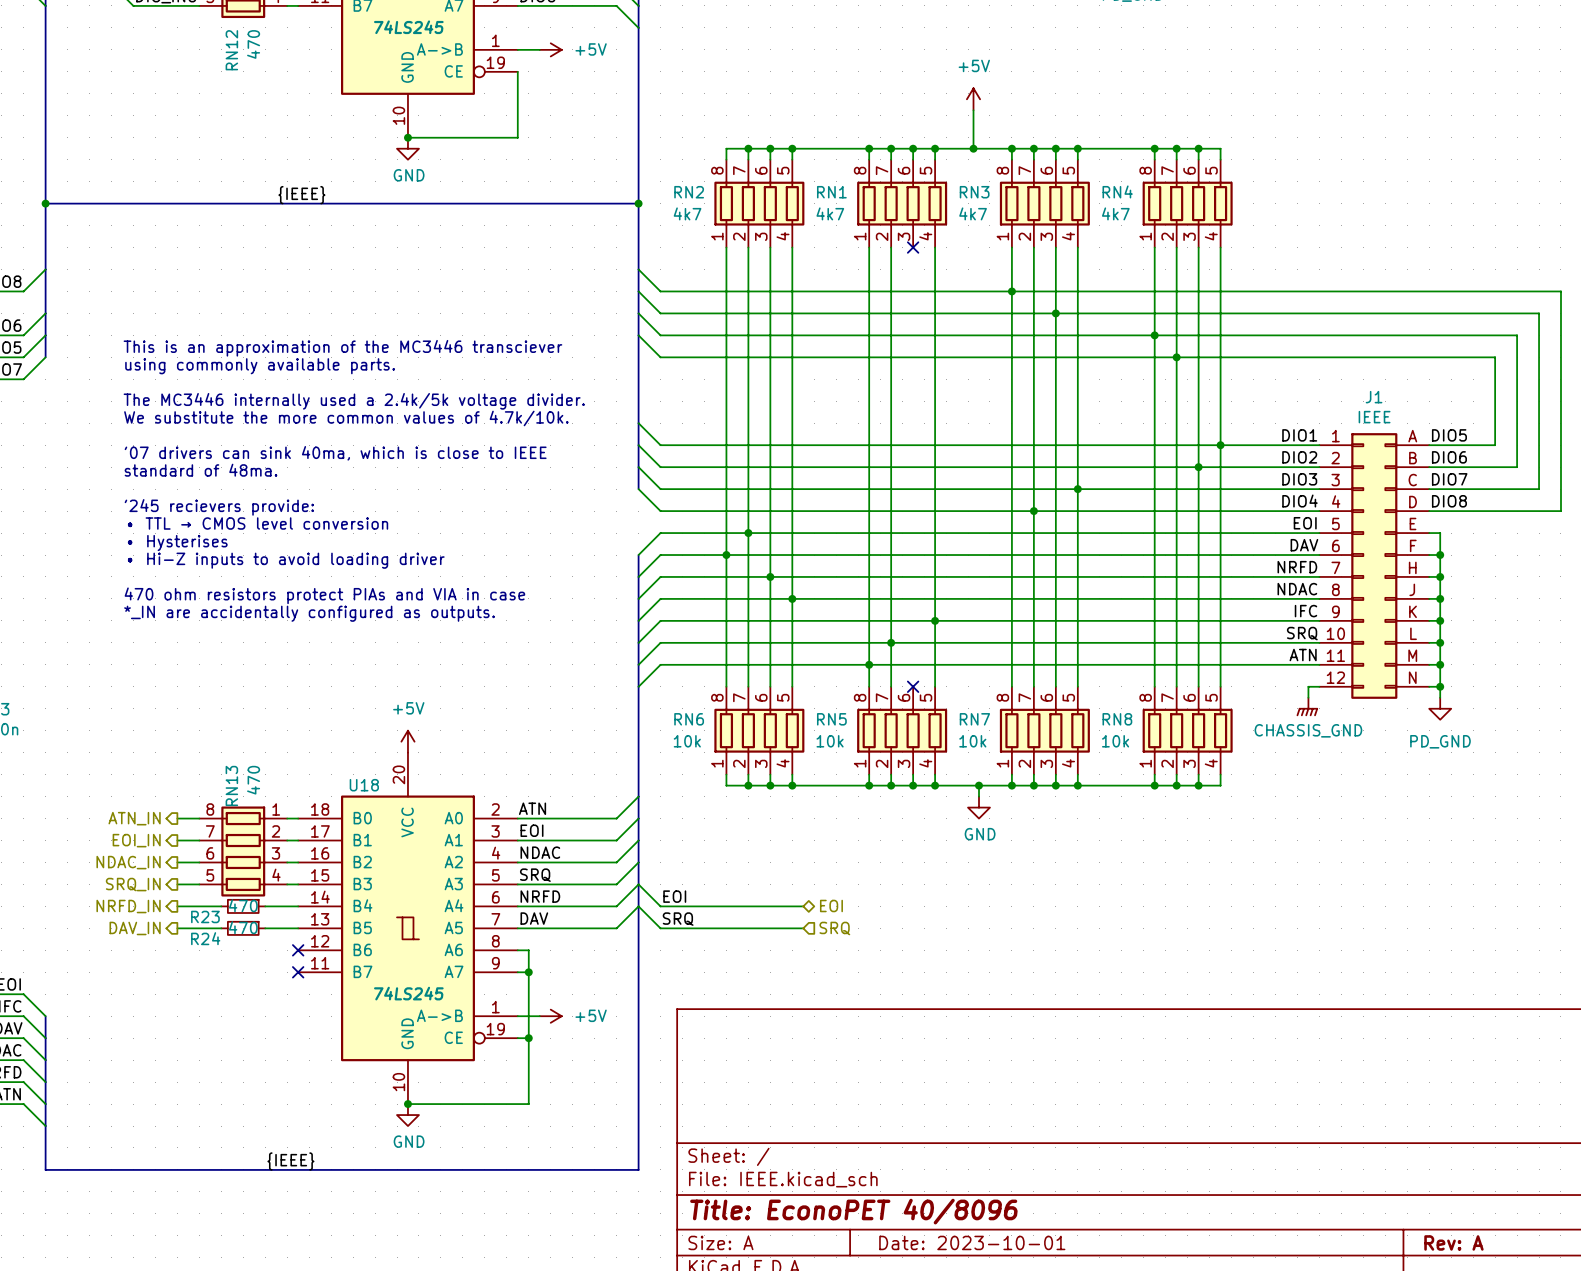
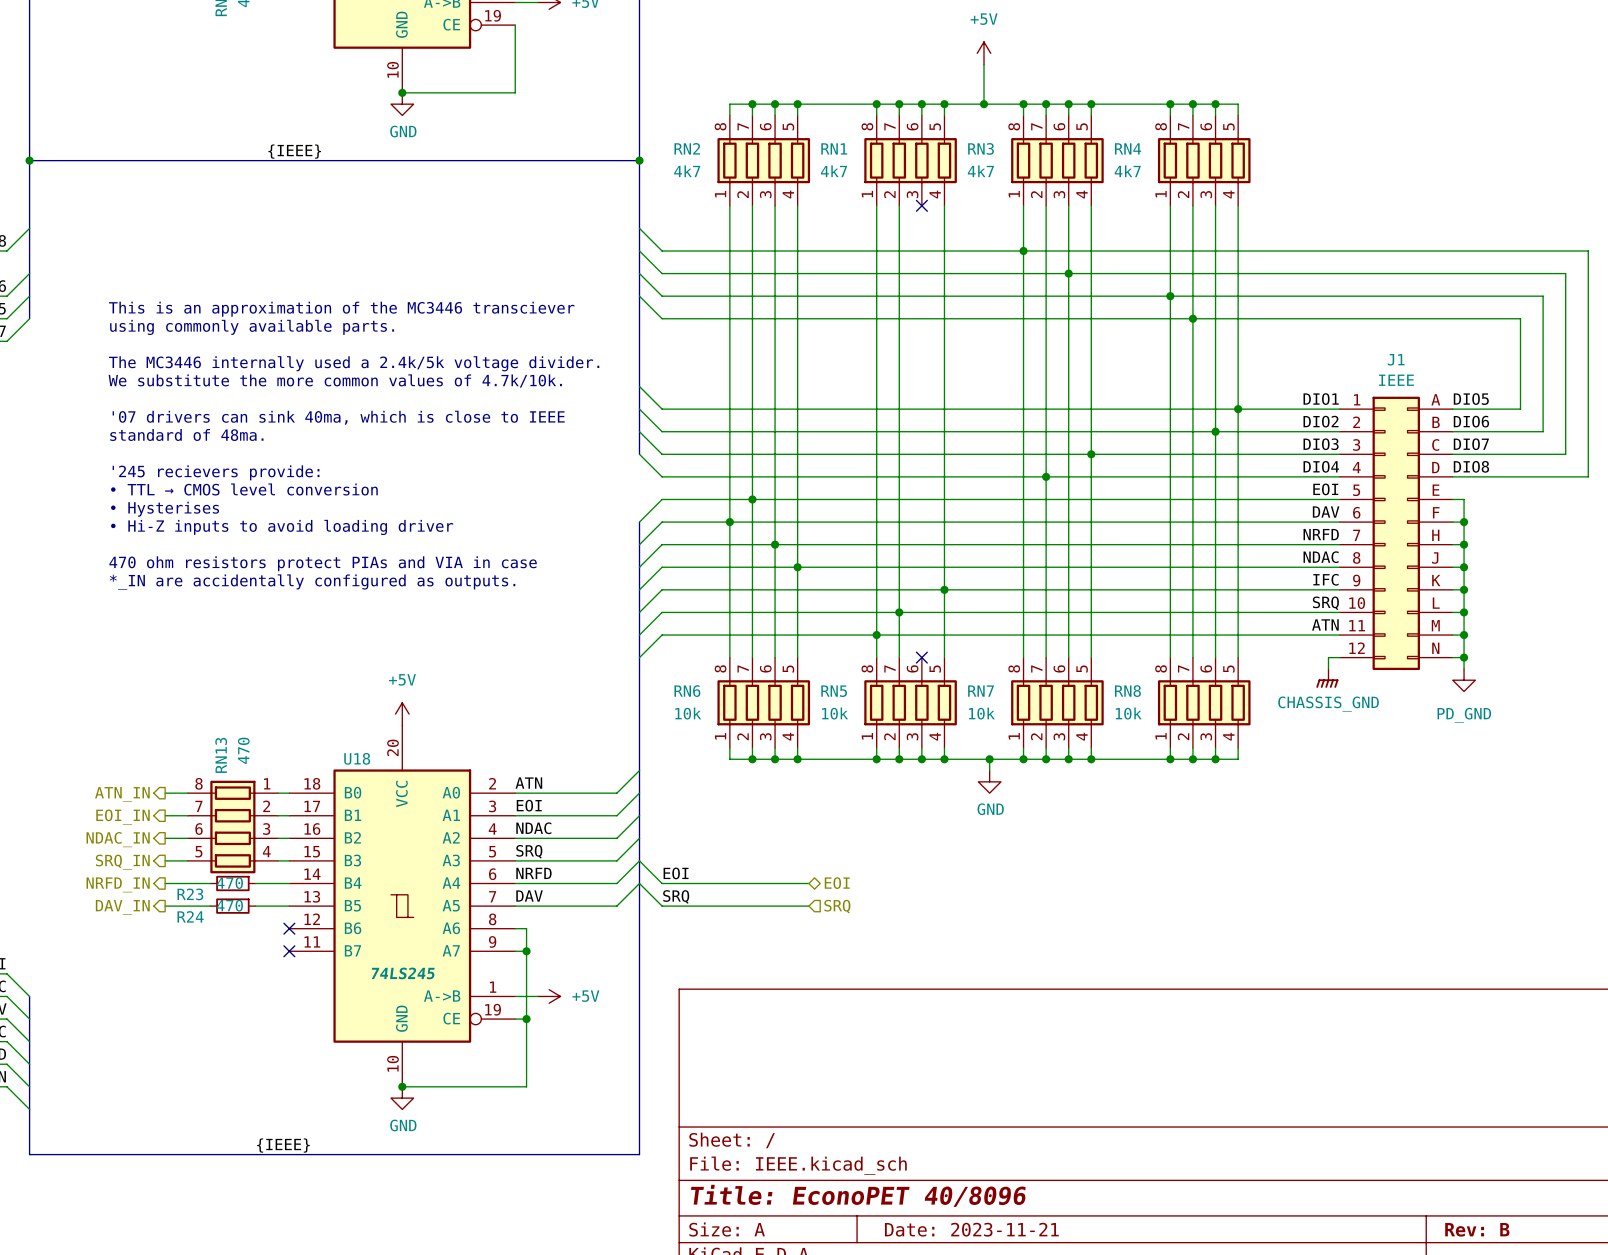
title block: Date: 2023-10-01 (972, 1242) -> Date: 2023-11-21 (971, 1229)
title block: Rev: A (1453, 1242) -> Rev: B (1477, 1229)

